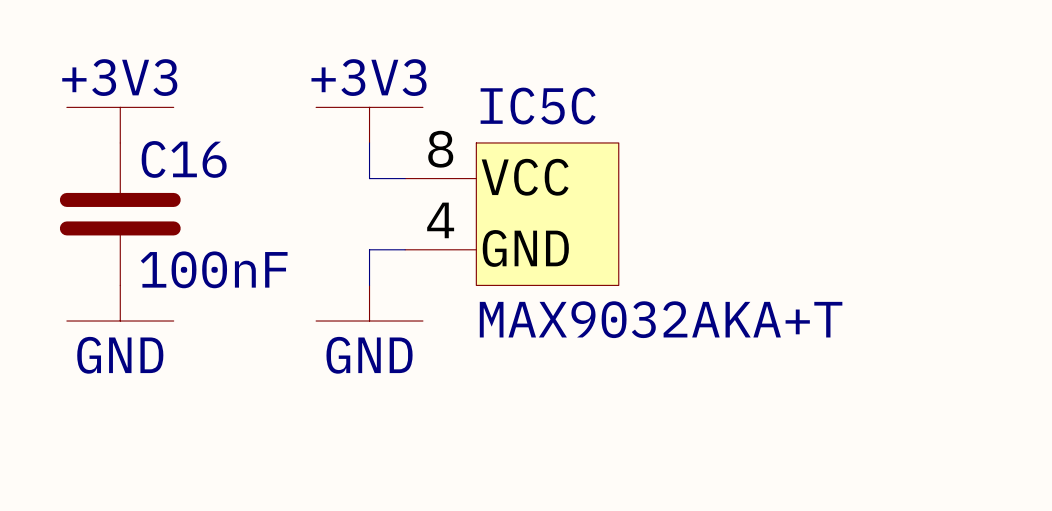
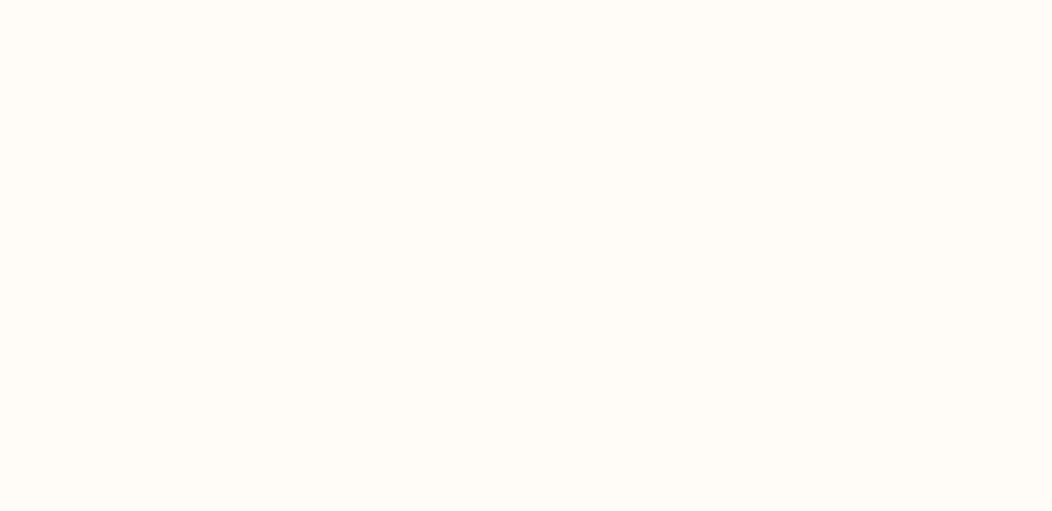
power symbol: +3V3 (120, 125) -> none
power symbol: +3V3 (369, 125) -> none
wire: (369, 142) (369, 178) (405, 178) -> none
C16: 100nF (120, 214) -> none
IC5C: MAX9032AKA+T (511, 214) -> none
wire: (405, 249) (369, 249) (369, 285) -> none
power symbol: GND (120, 303) -> none
power symbol: GND (369, 303) -> none

